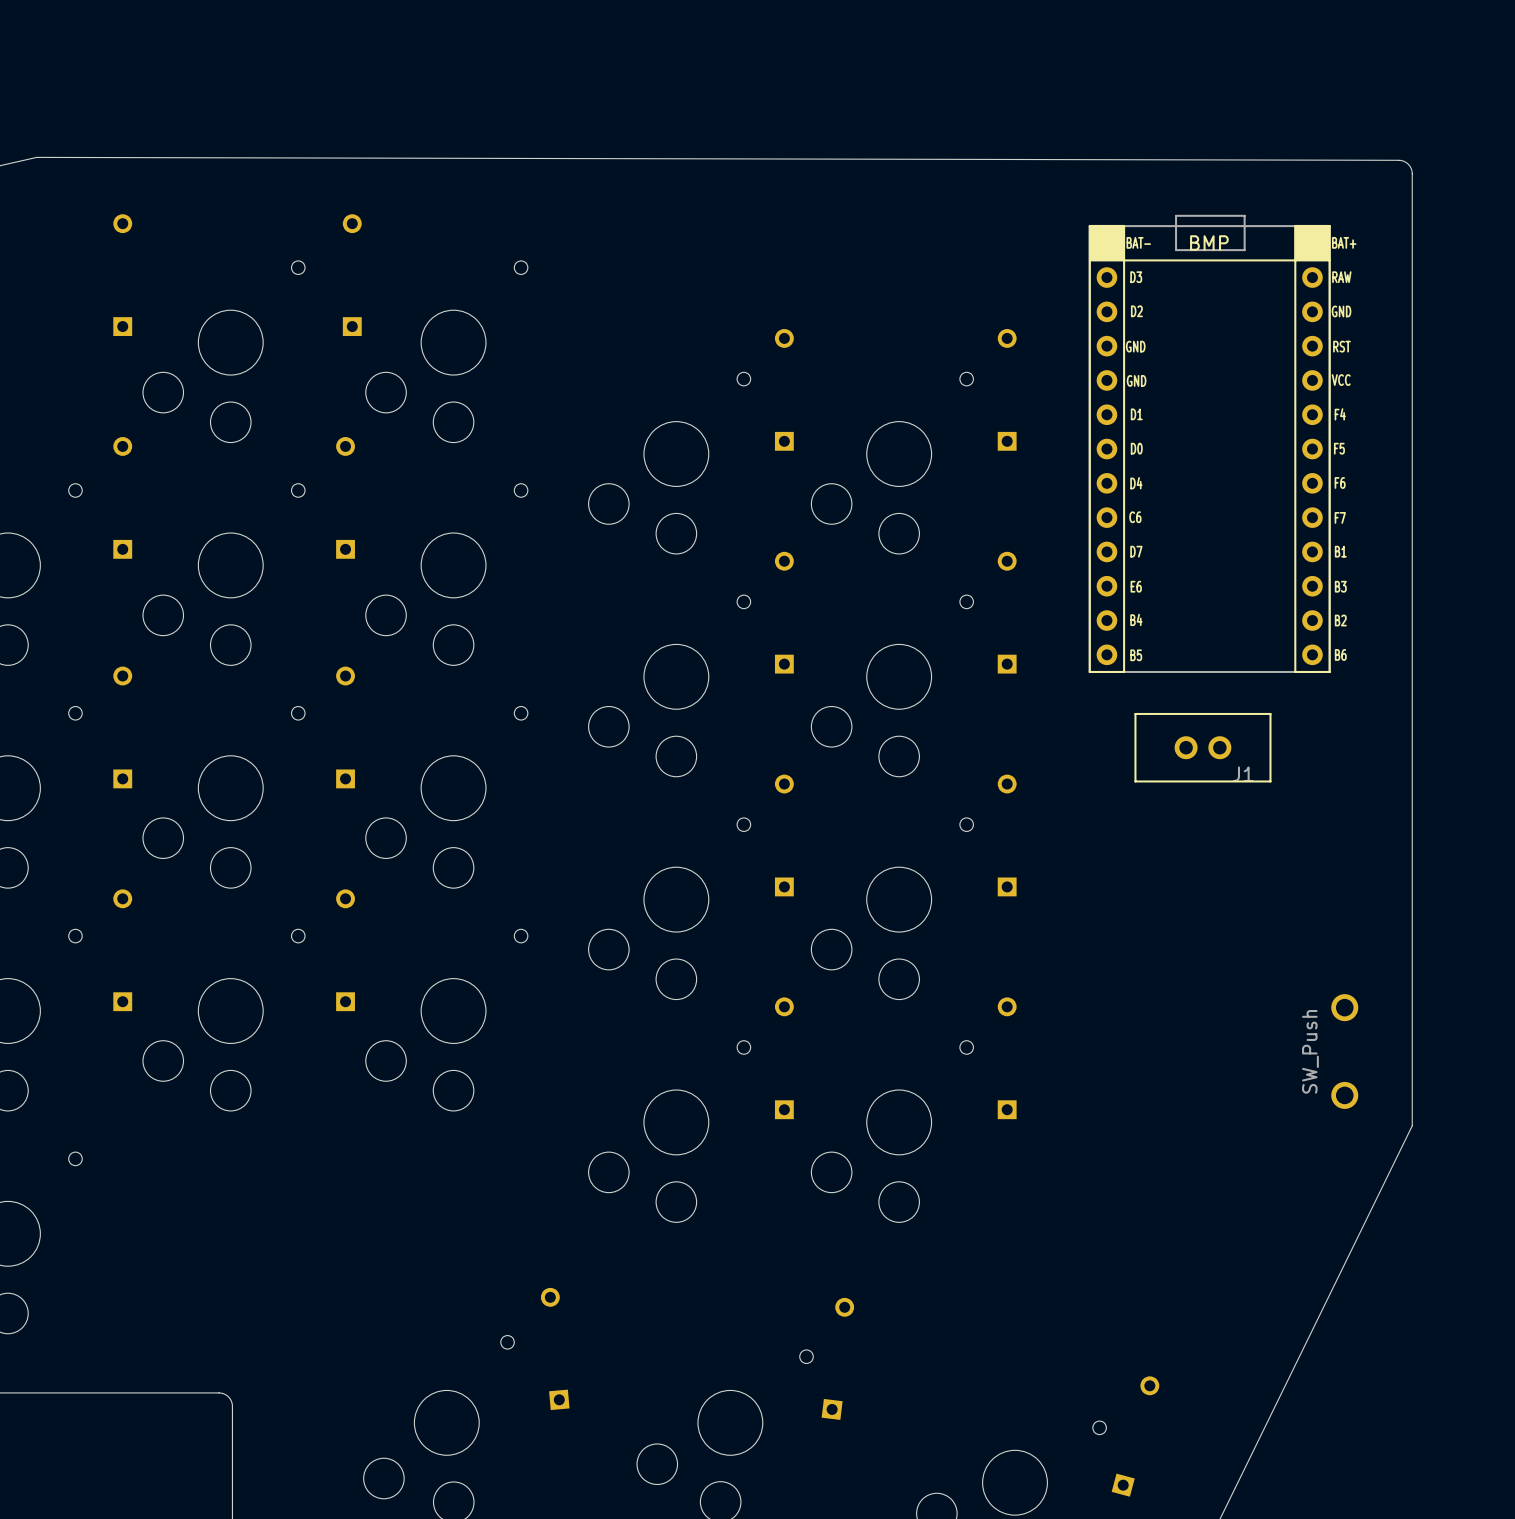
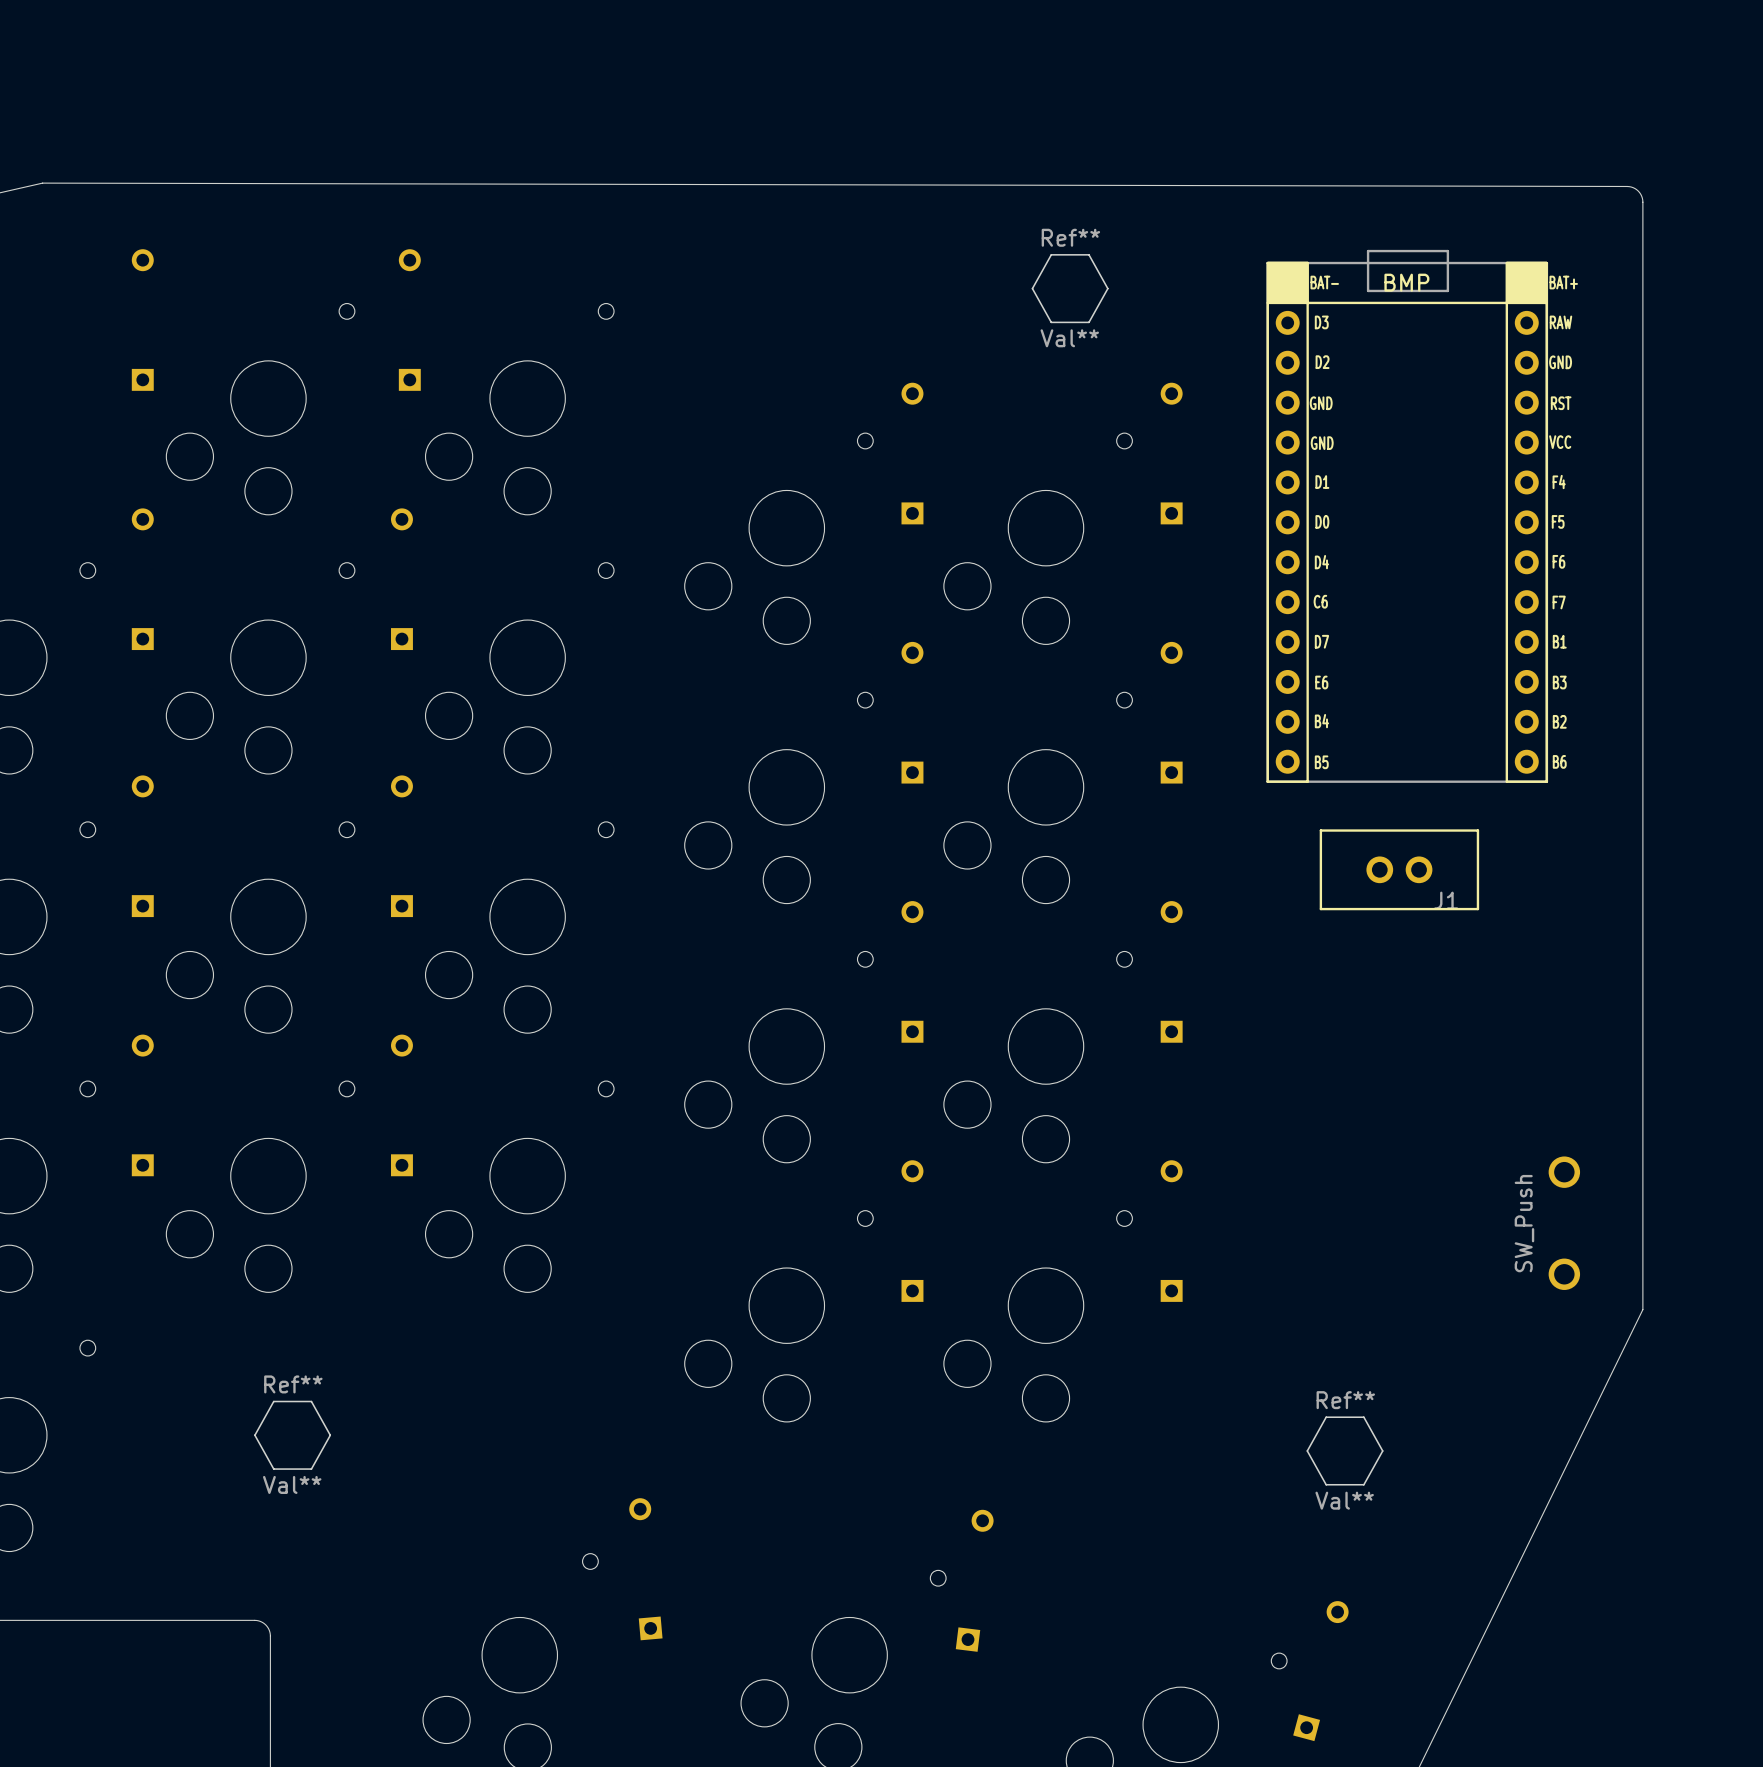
Ref**: none -> Val** (1070, 288)
Ref**: none -> Val** (292, 1435)
Ref**: none -> Val** (1345, 1450)

